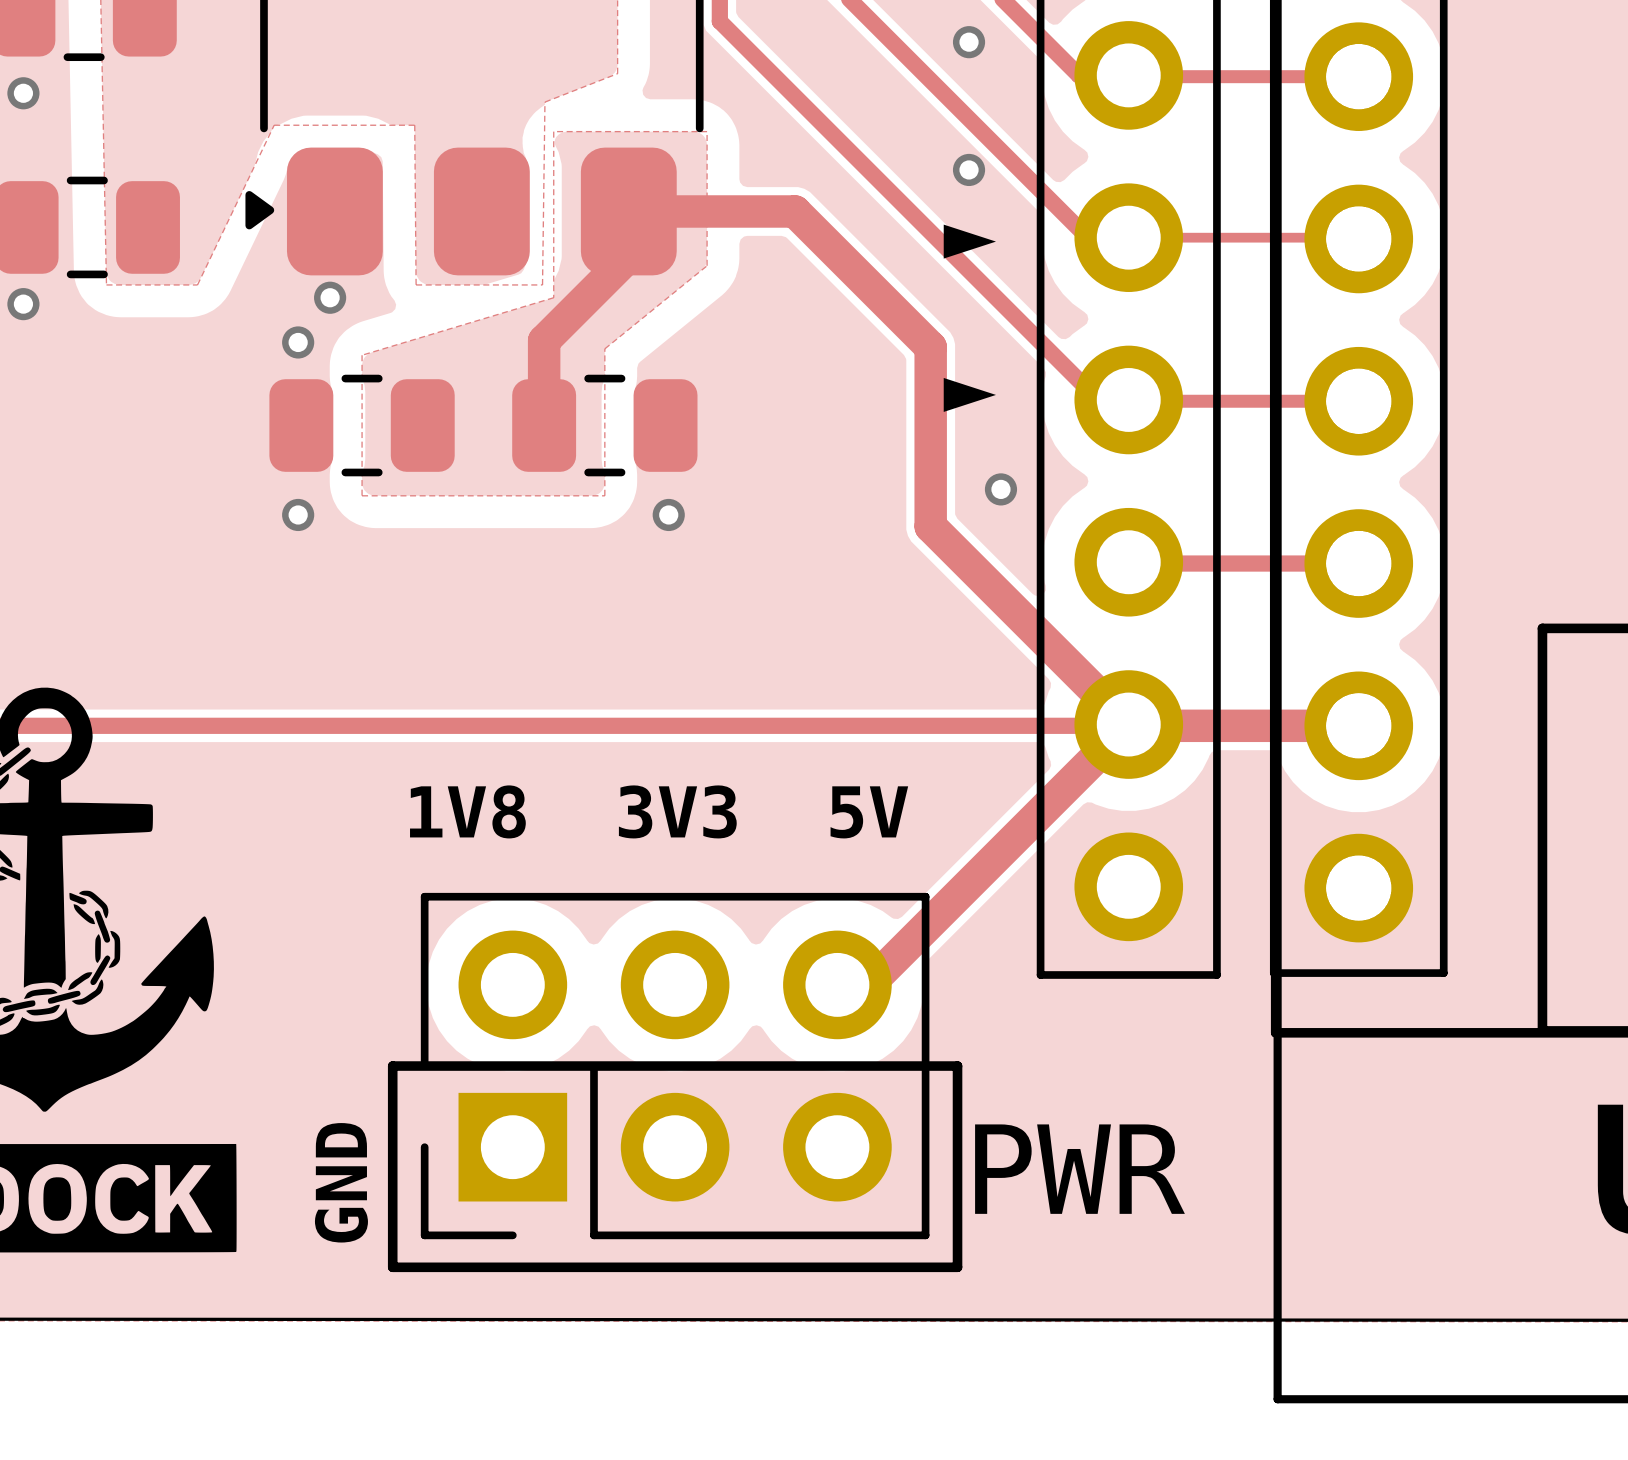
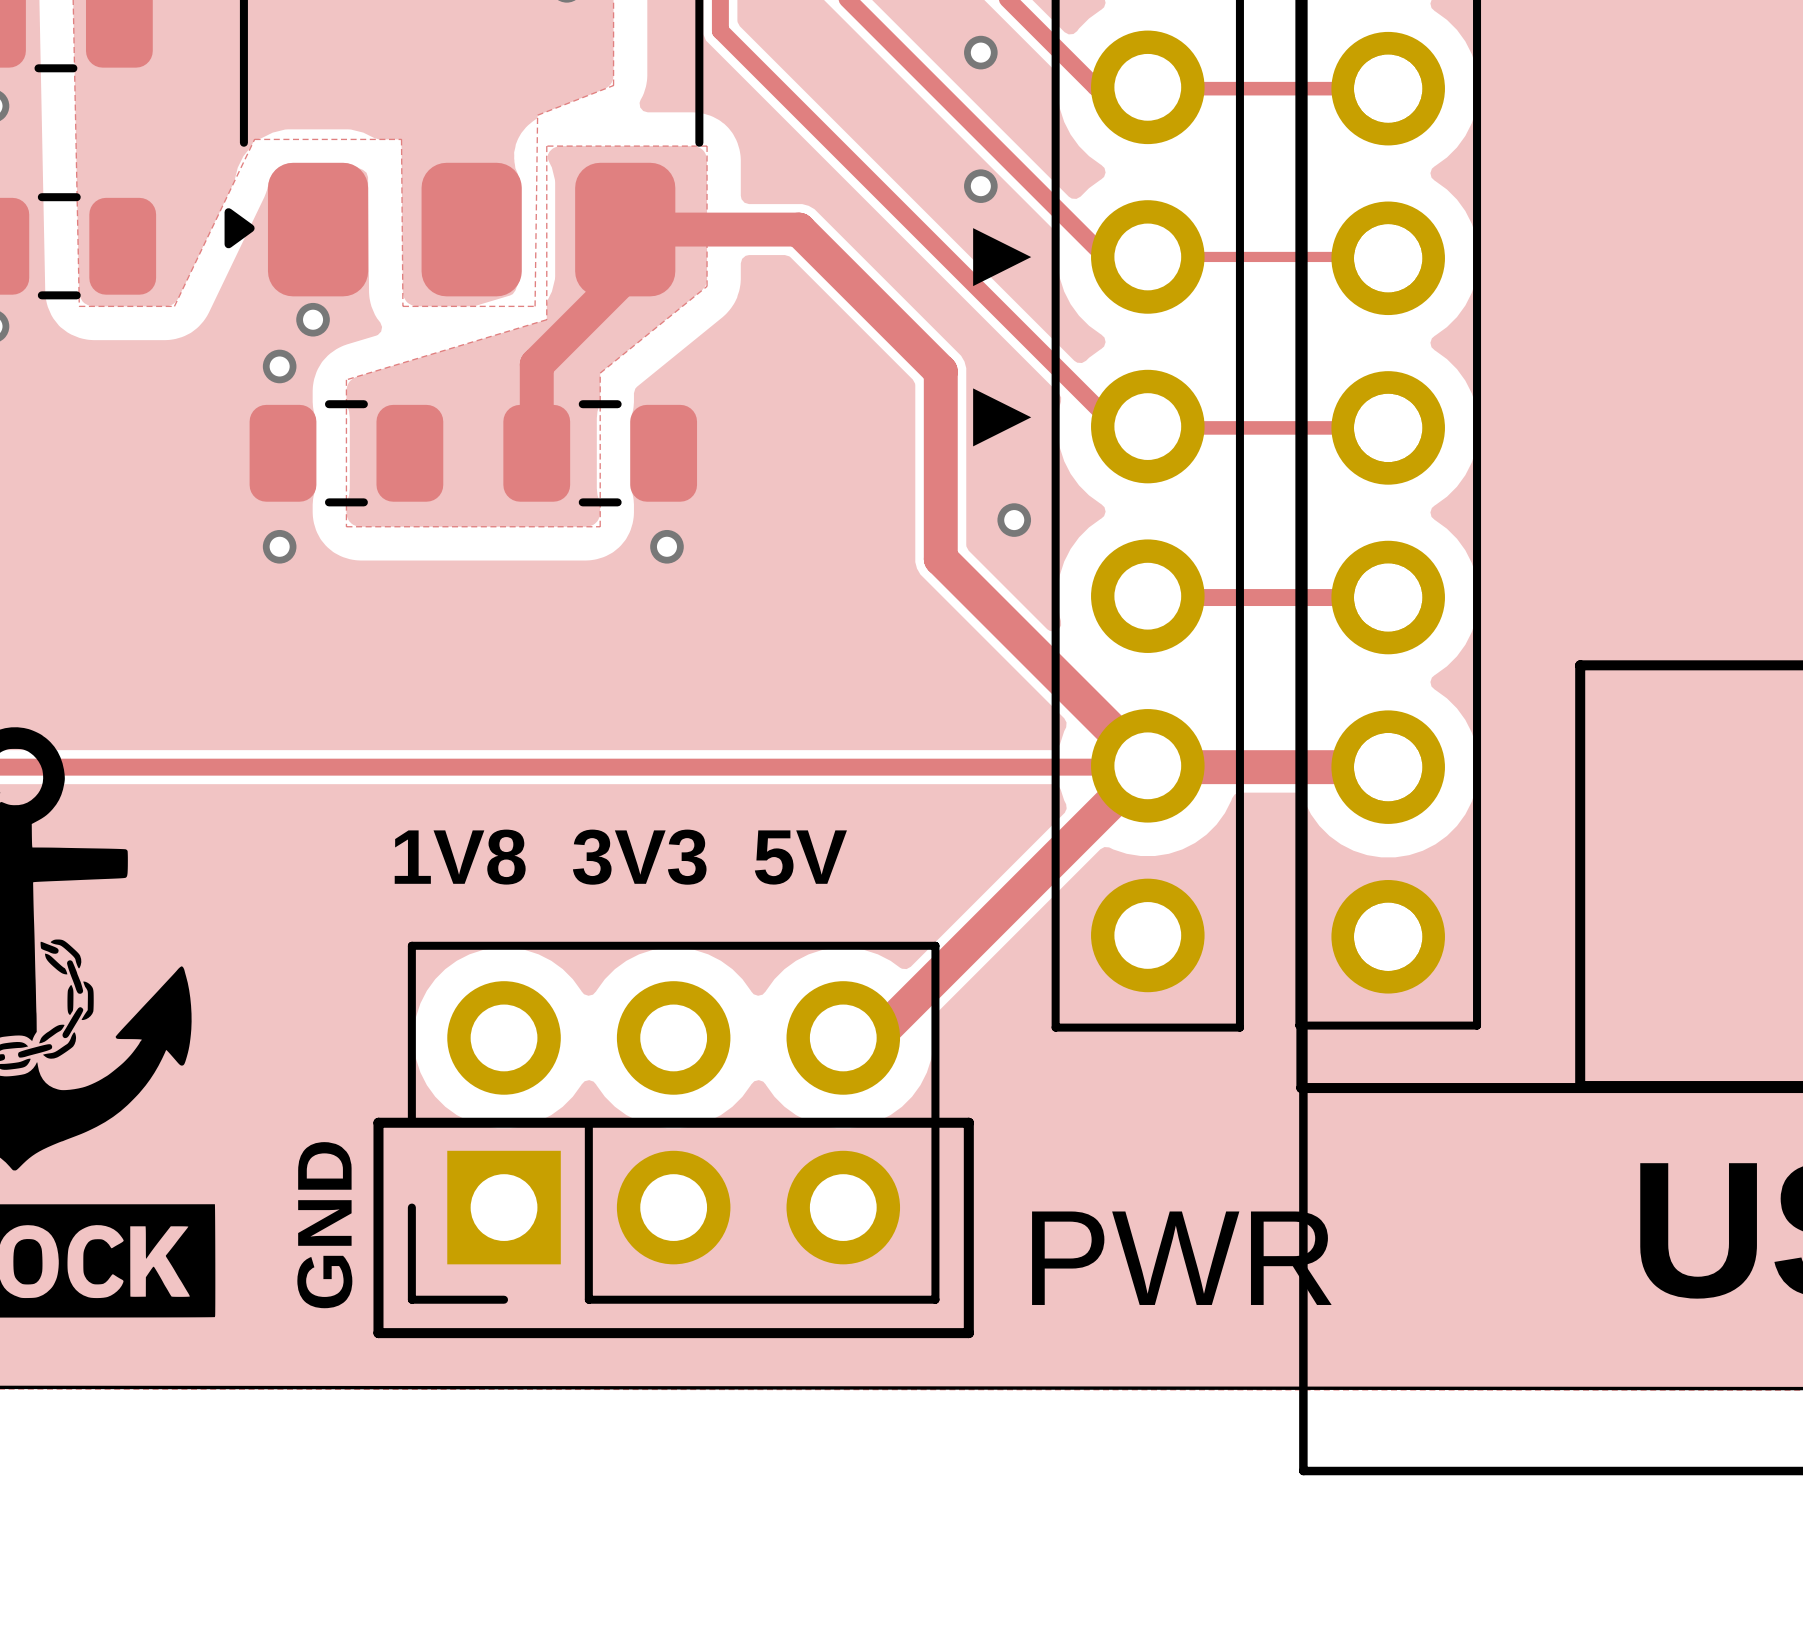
text position: PWR (1079, 1169) -> PWR (1181, 1258)

